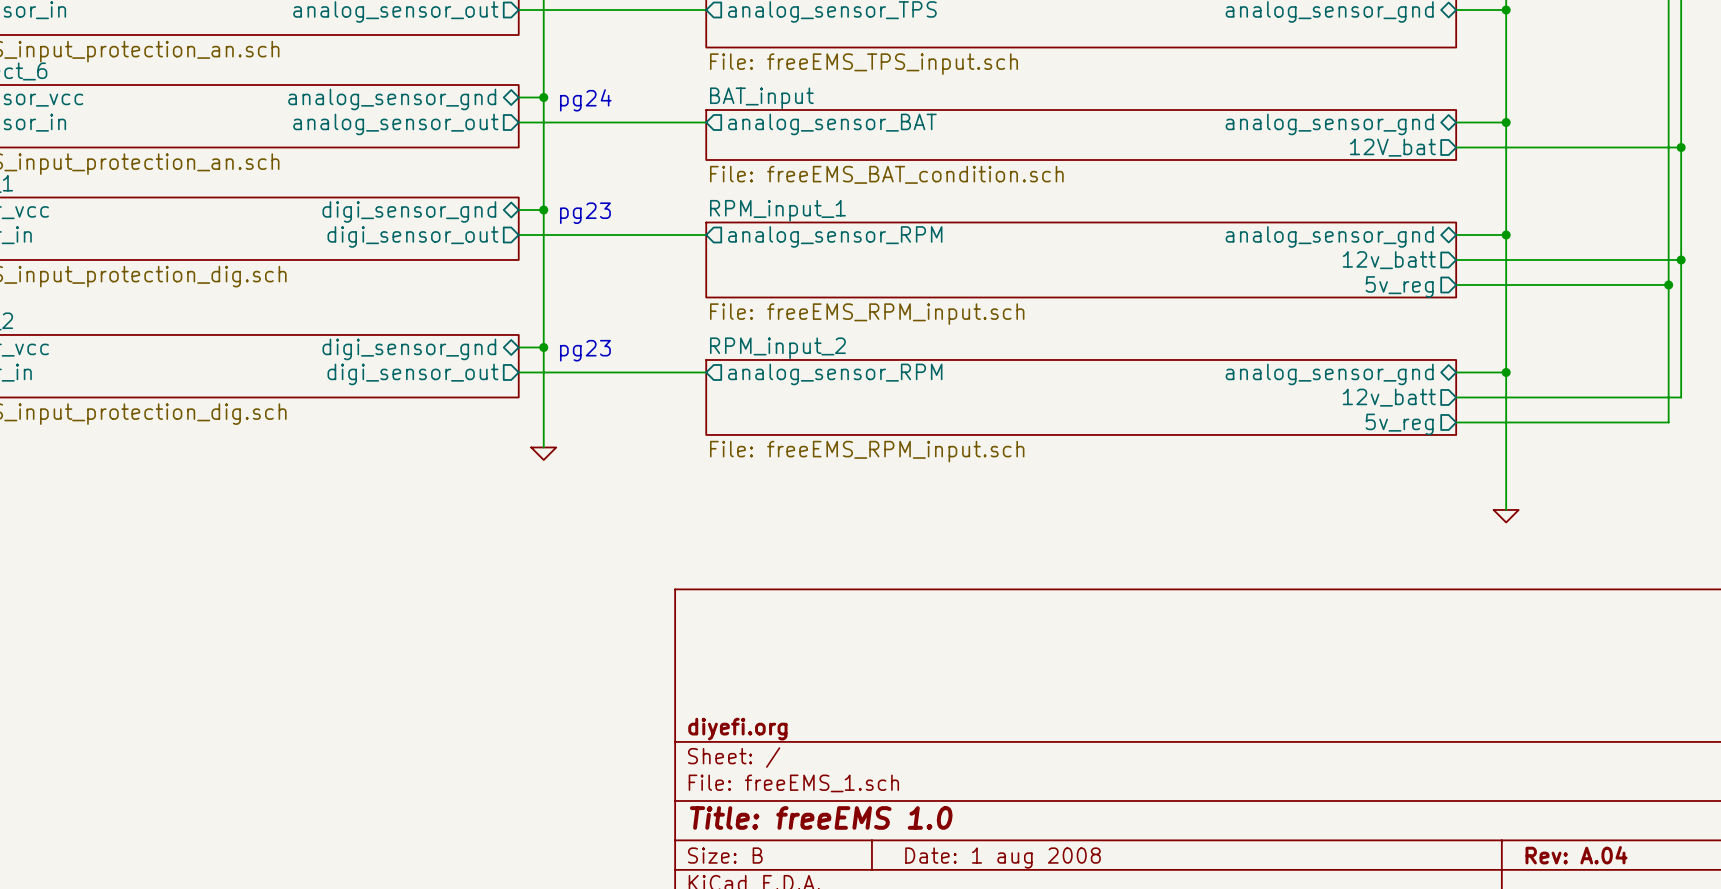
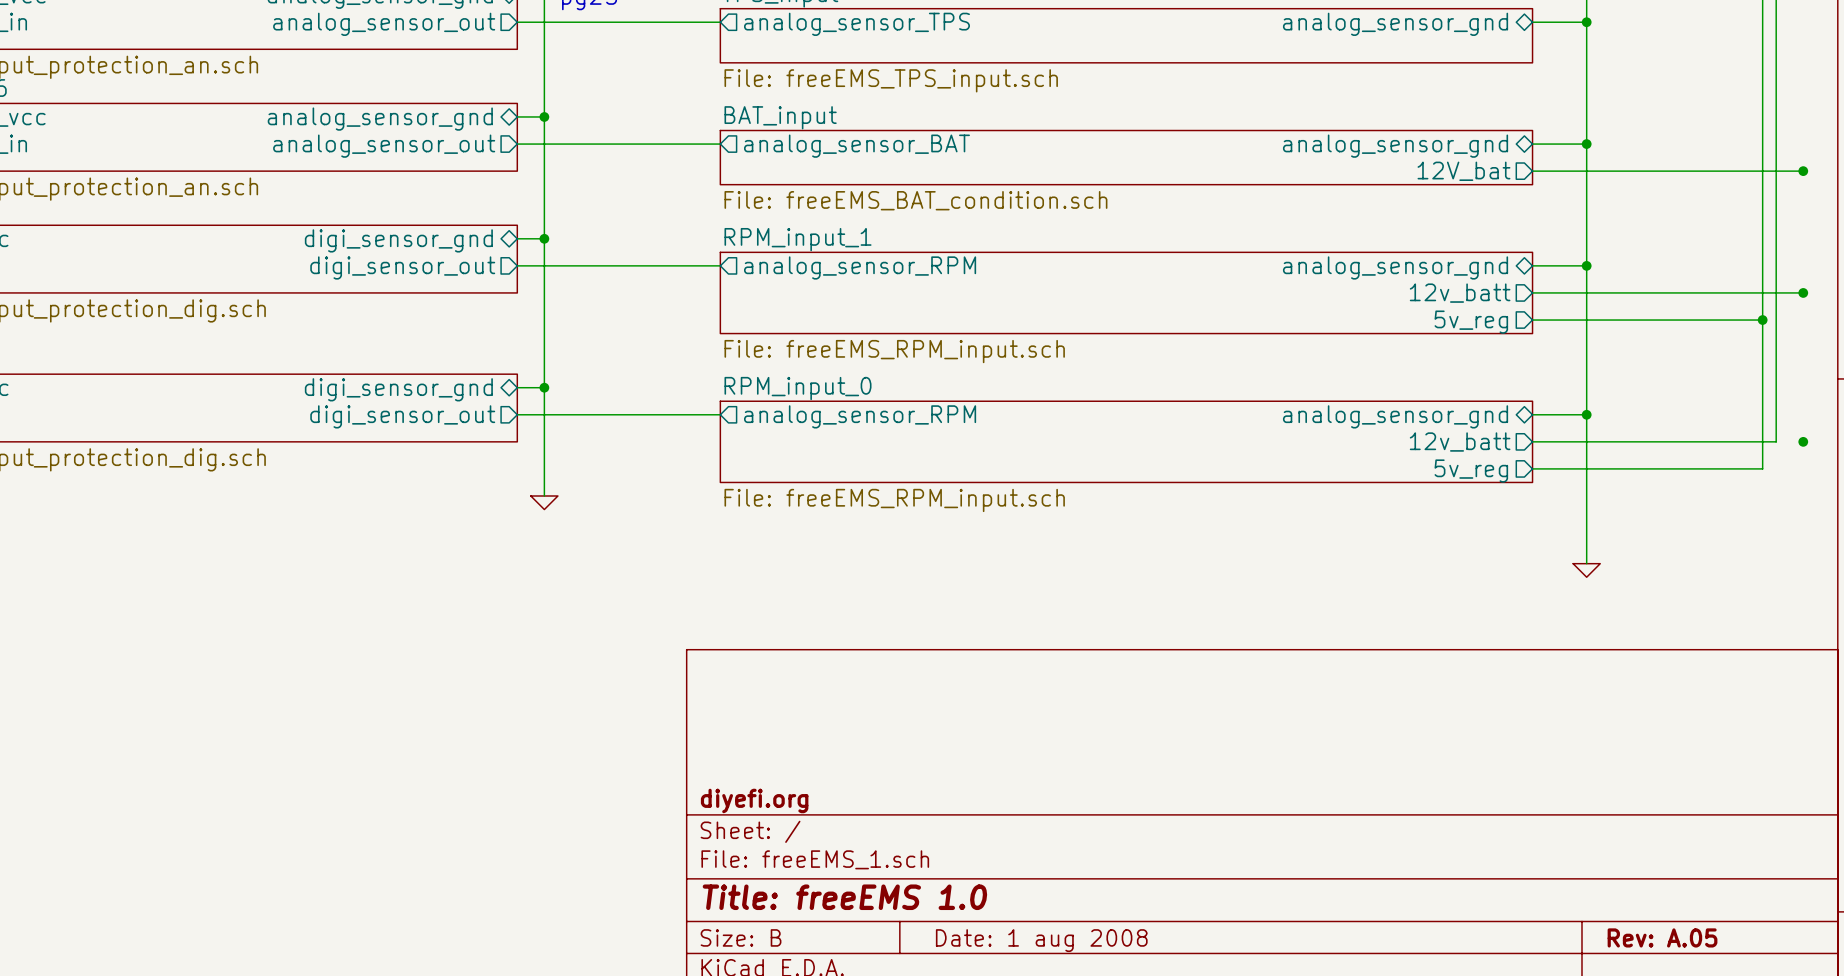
text: pg24 (585, 100) -> none
wire: none -> (1776, 171) (1803, 171)
junction position: (1681, 147) -> (1803, 171)
text: pg23 (585, 213) -> none
wire: none -> (1776, 292) (1803, 292)
junction position: (1681, 259) -> (1803, 292)
sheet RPM_input_2 name: RPM_input_2 (777, 348) -> RPM_input_0 (798, 388)
text: pg23 (585, 350) -> none
junction: none -> (1803, 441)
title block: Rev: A.04 (1576, 855) -> Rev: A.05 (1662, 937)

